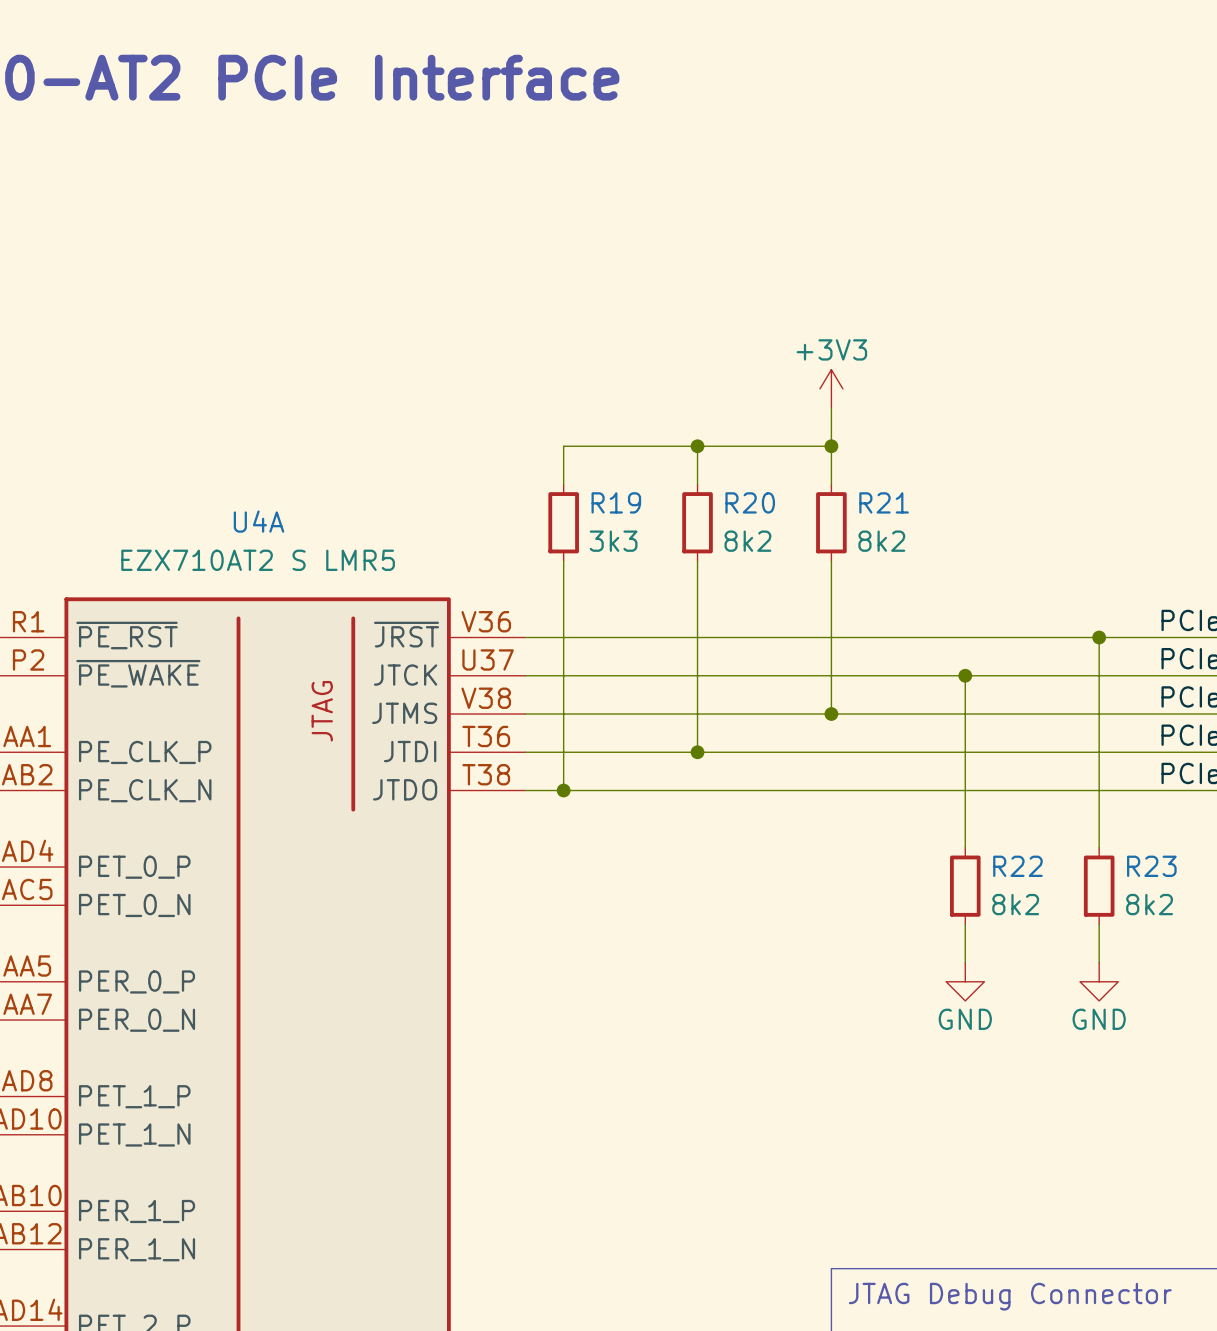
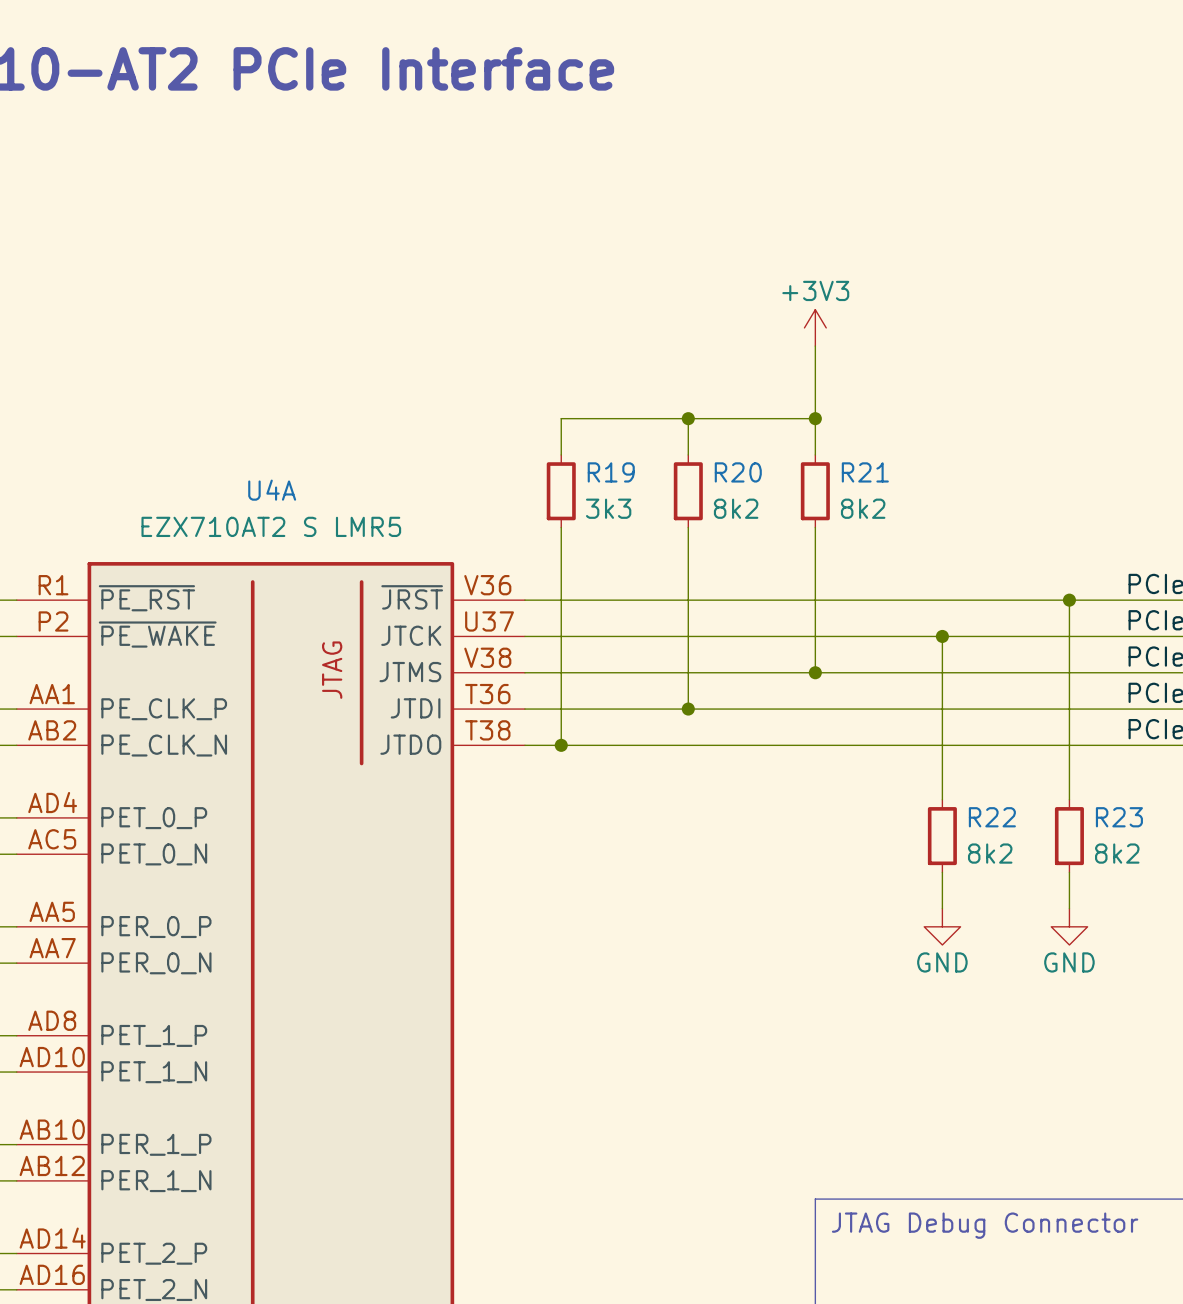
power symbol position: +3V3 (831, 388) -> +3V3 (815, 327)

